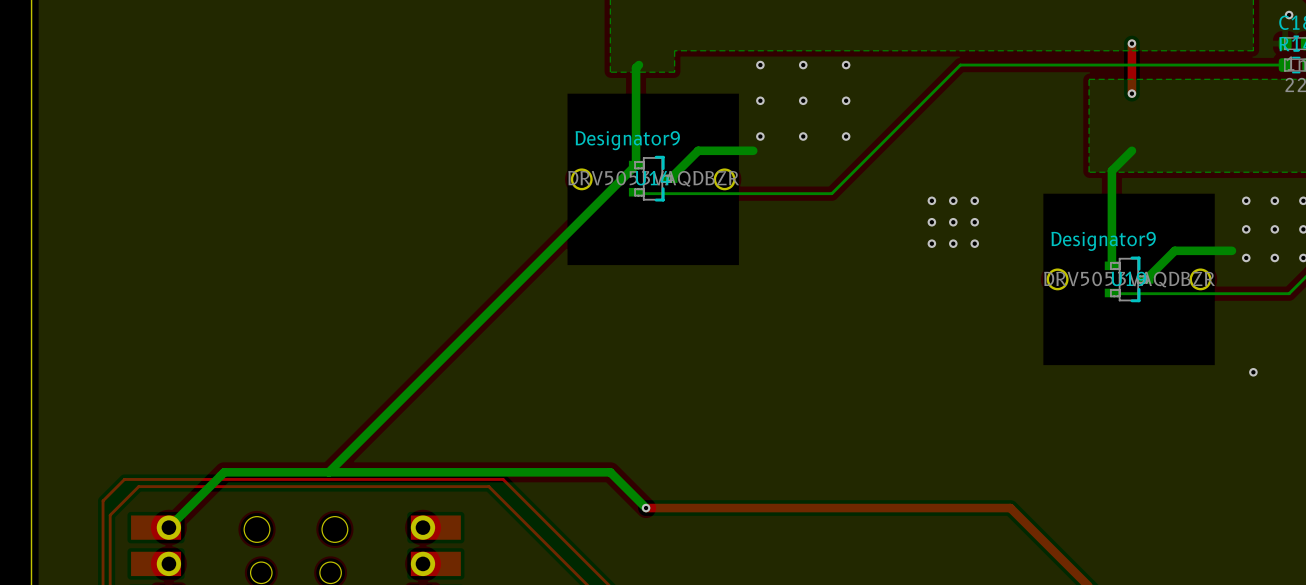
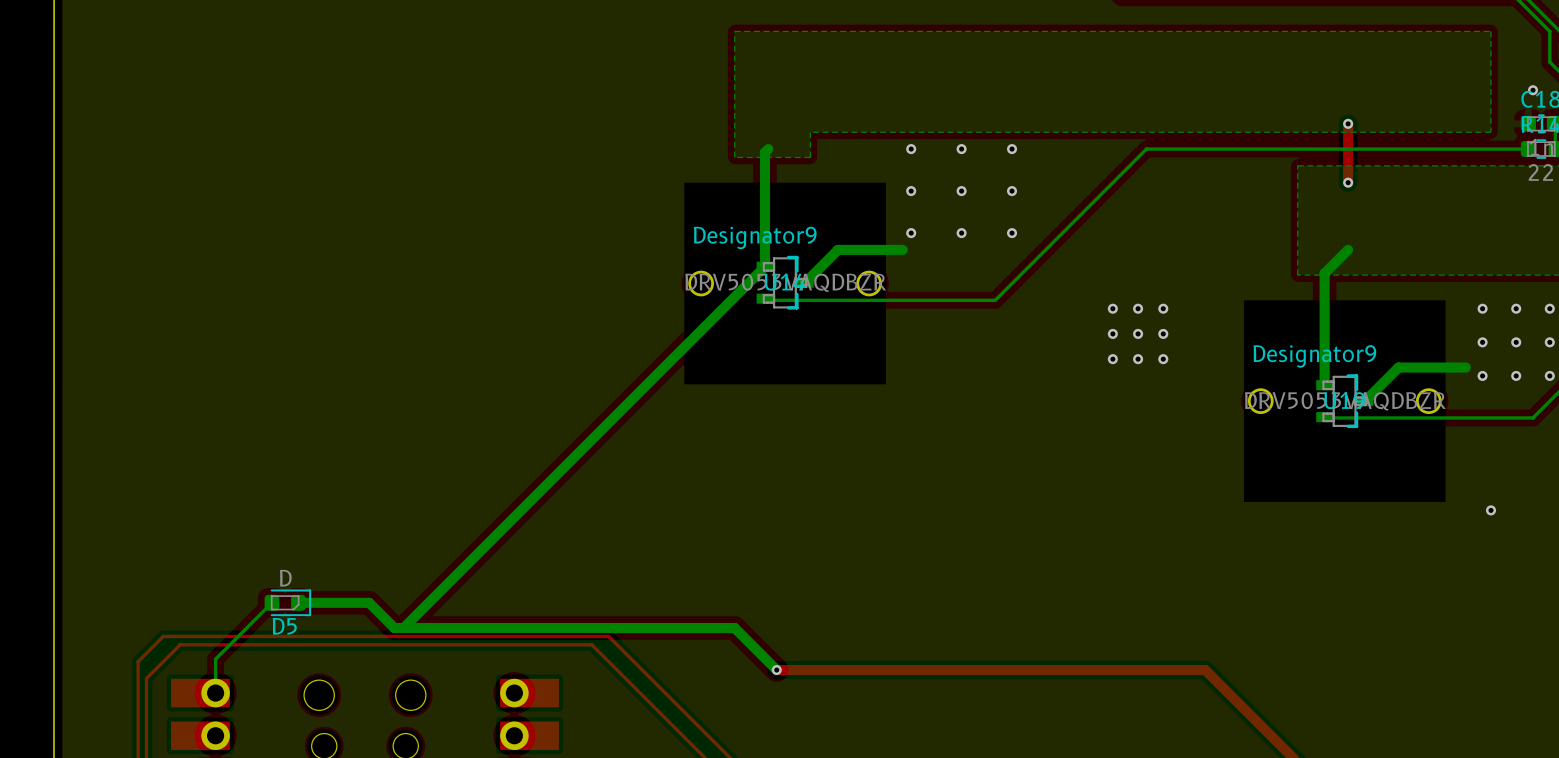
bottom track: none -> (271, 602) (215, 659) (215, 693)
D5: none -> D (287, 602)
bottom track: (320, 472) (224, 472) (168, 527) -> (394, 628) (369, 602) (298, 602)

